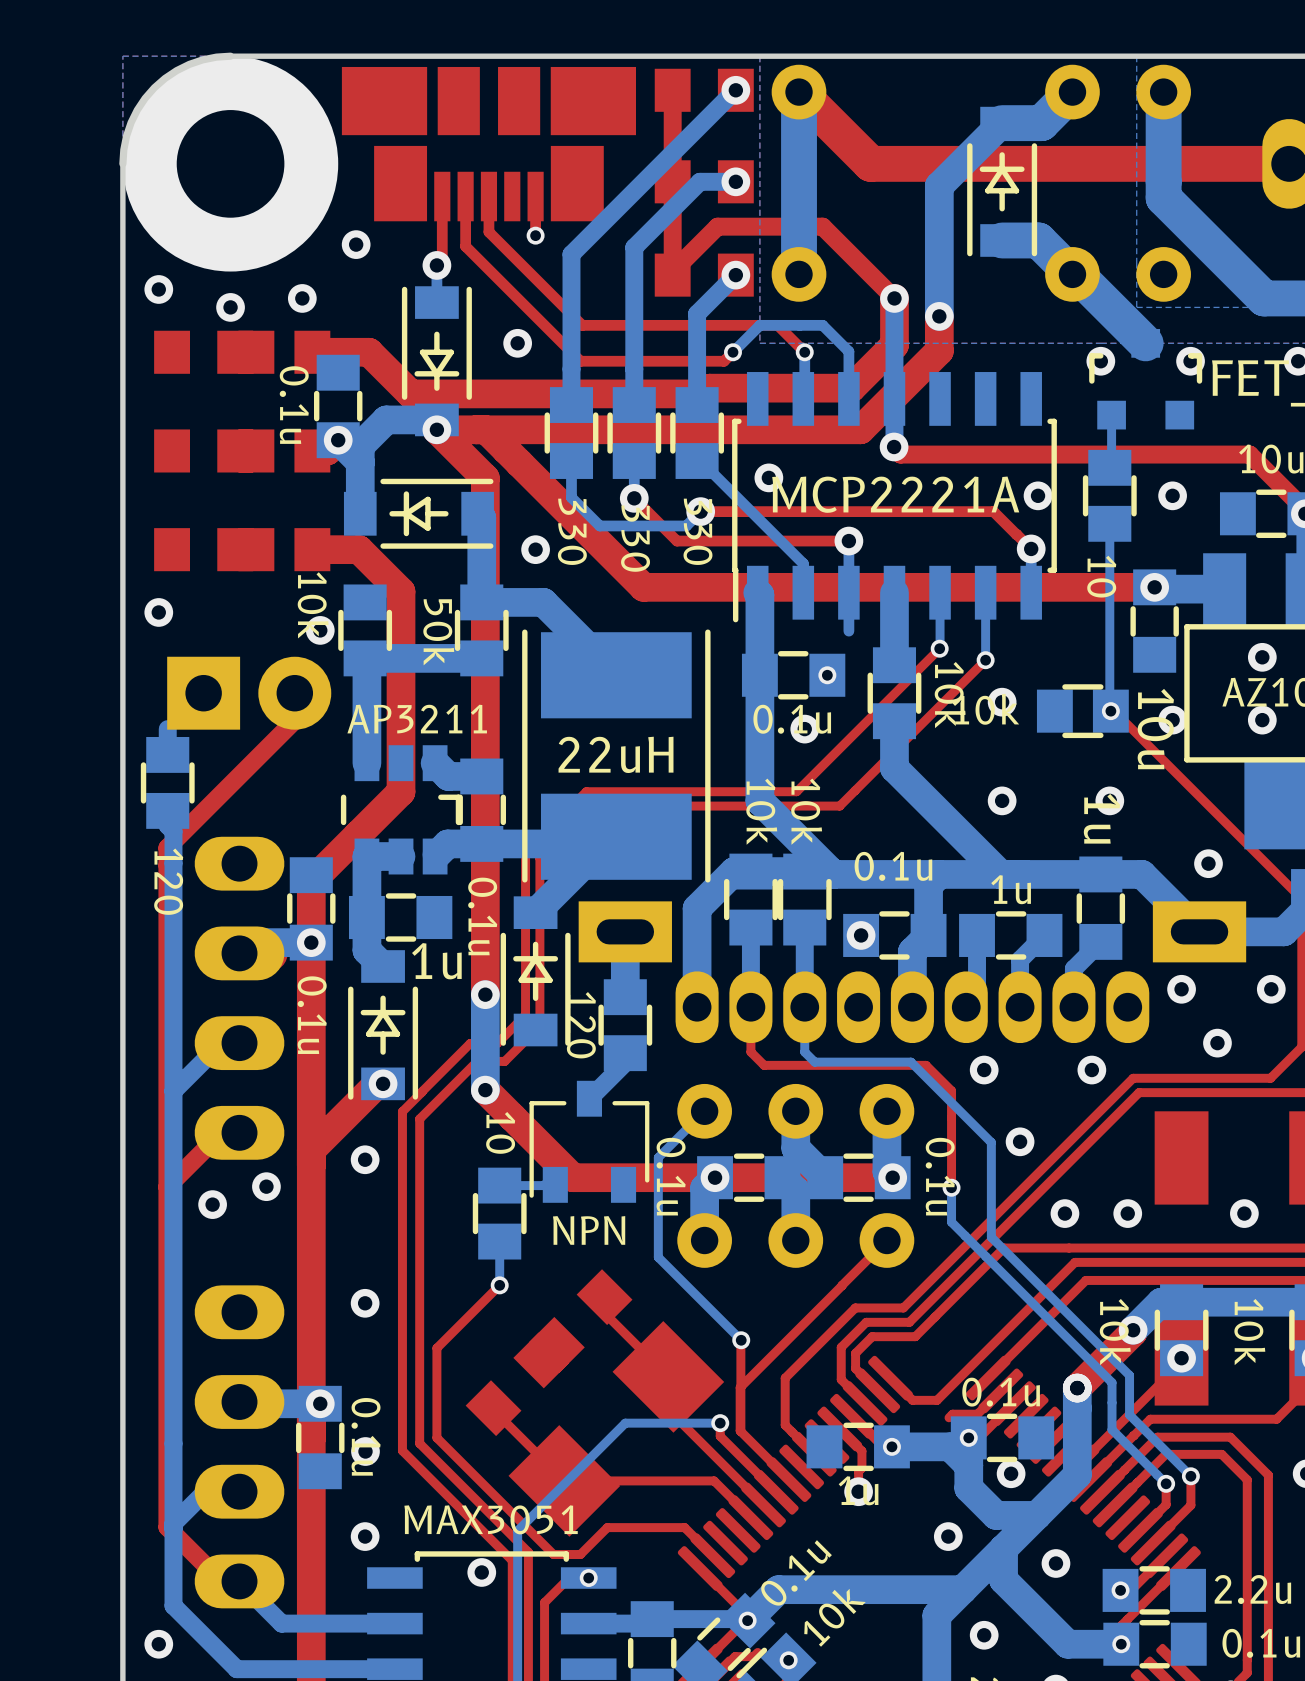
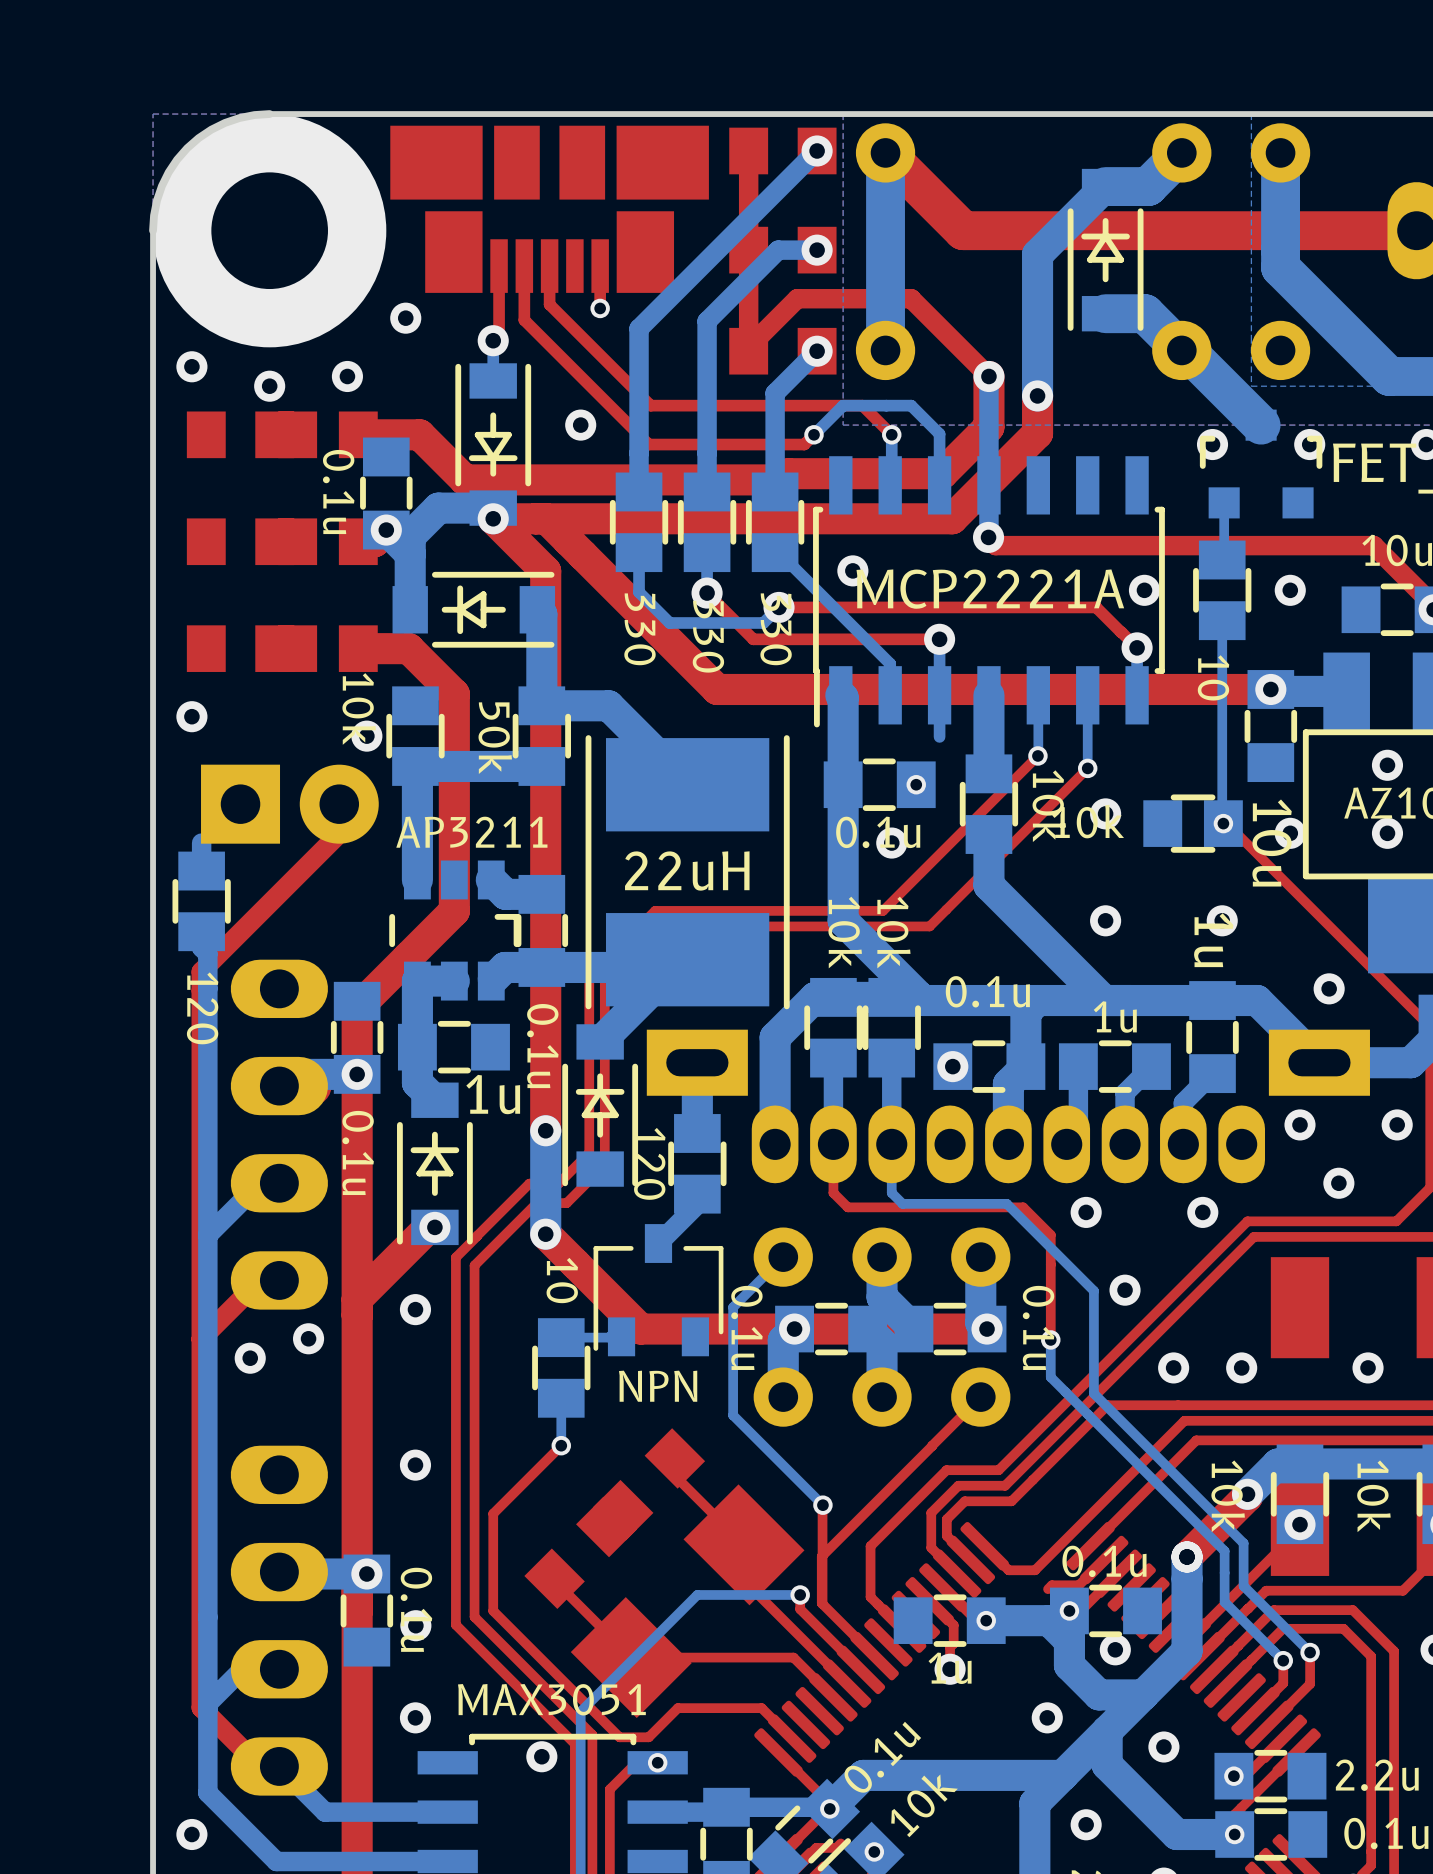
via: (535, 549) -> none

